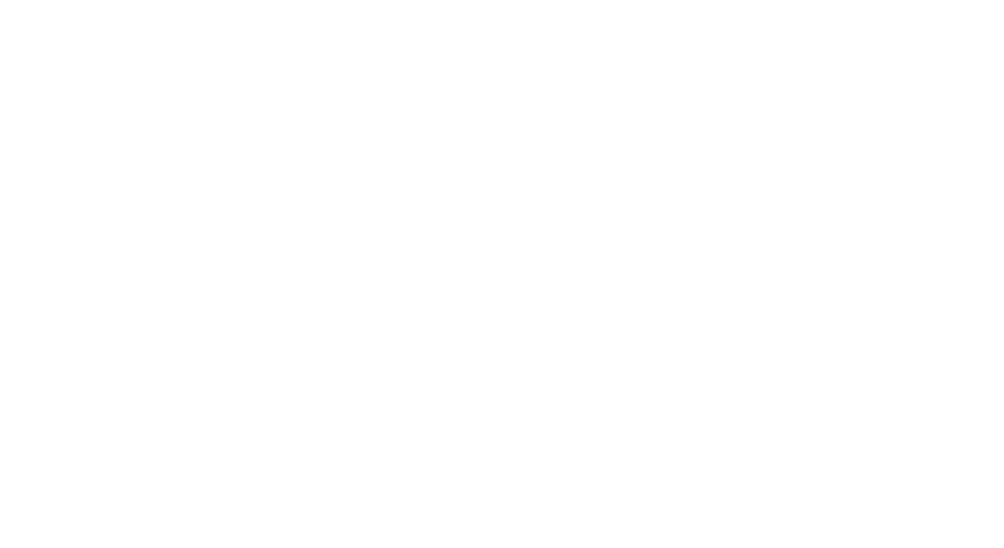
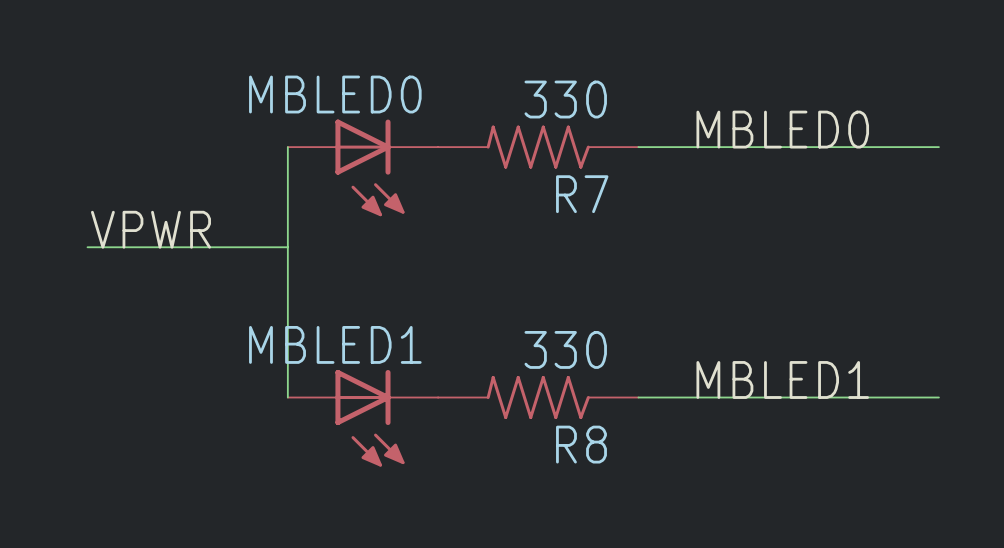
label: none -> MBLED0 (782, 129)
wire: none -> (287, 147) (287, 397)
R7: none -> 330 (538, 147)
wire: none -> (638, 147) (938, 147)
MBLED0: none -> (362, 167)
label: none -> VPWR (150, 229)
wire: none -> (87, 247) (287, 247)
label: none -> MBLED1 (782, 379)
R8: none -> 330 (538, 397)
wire: none -> (638, 397) (938, 397)
MBLED1: none -> (362, 418)

